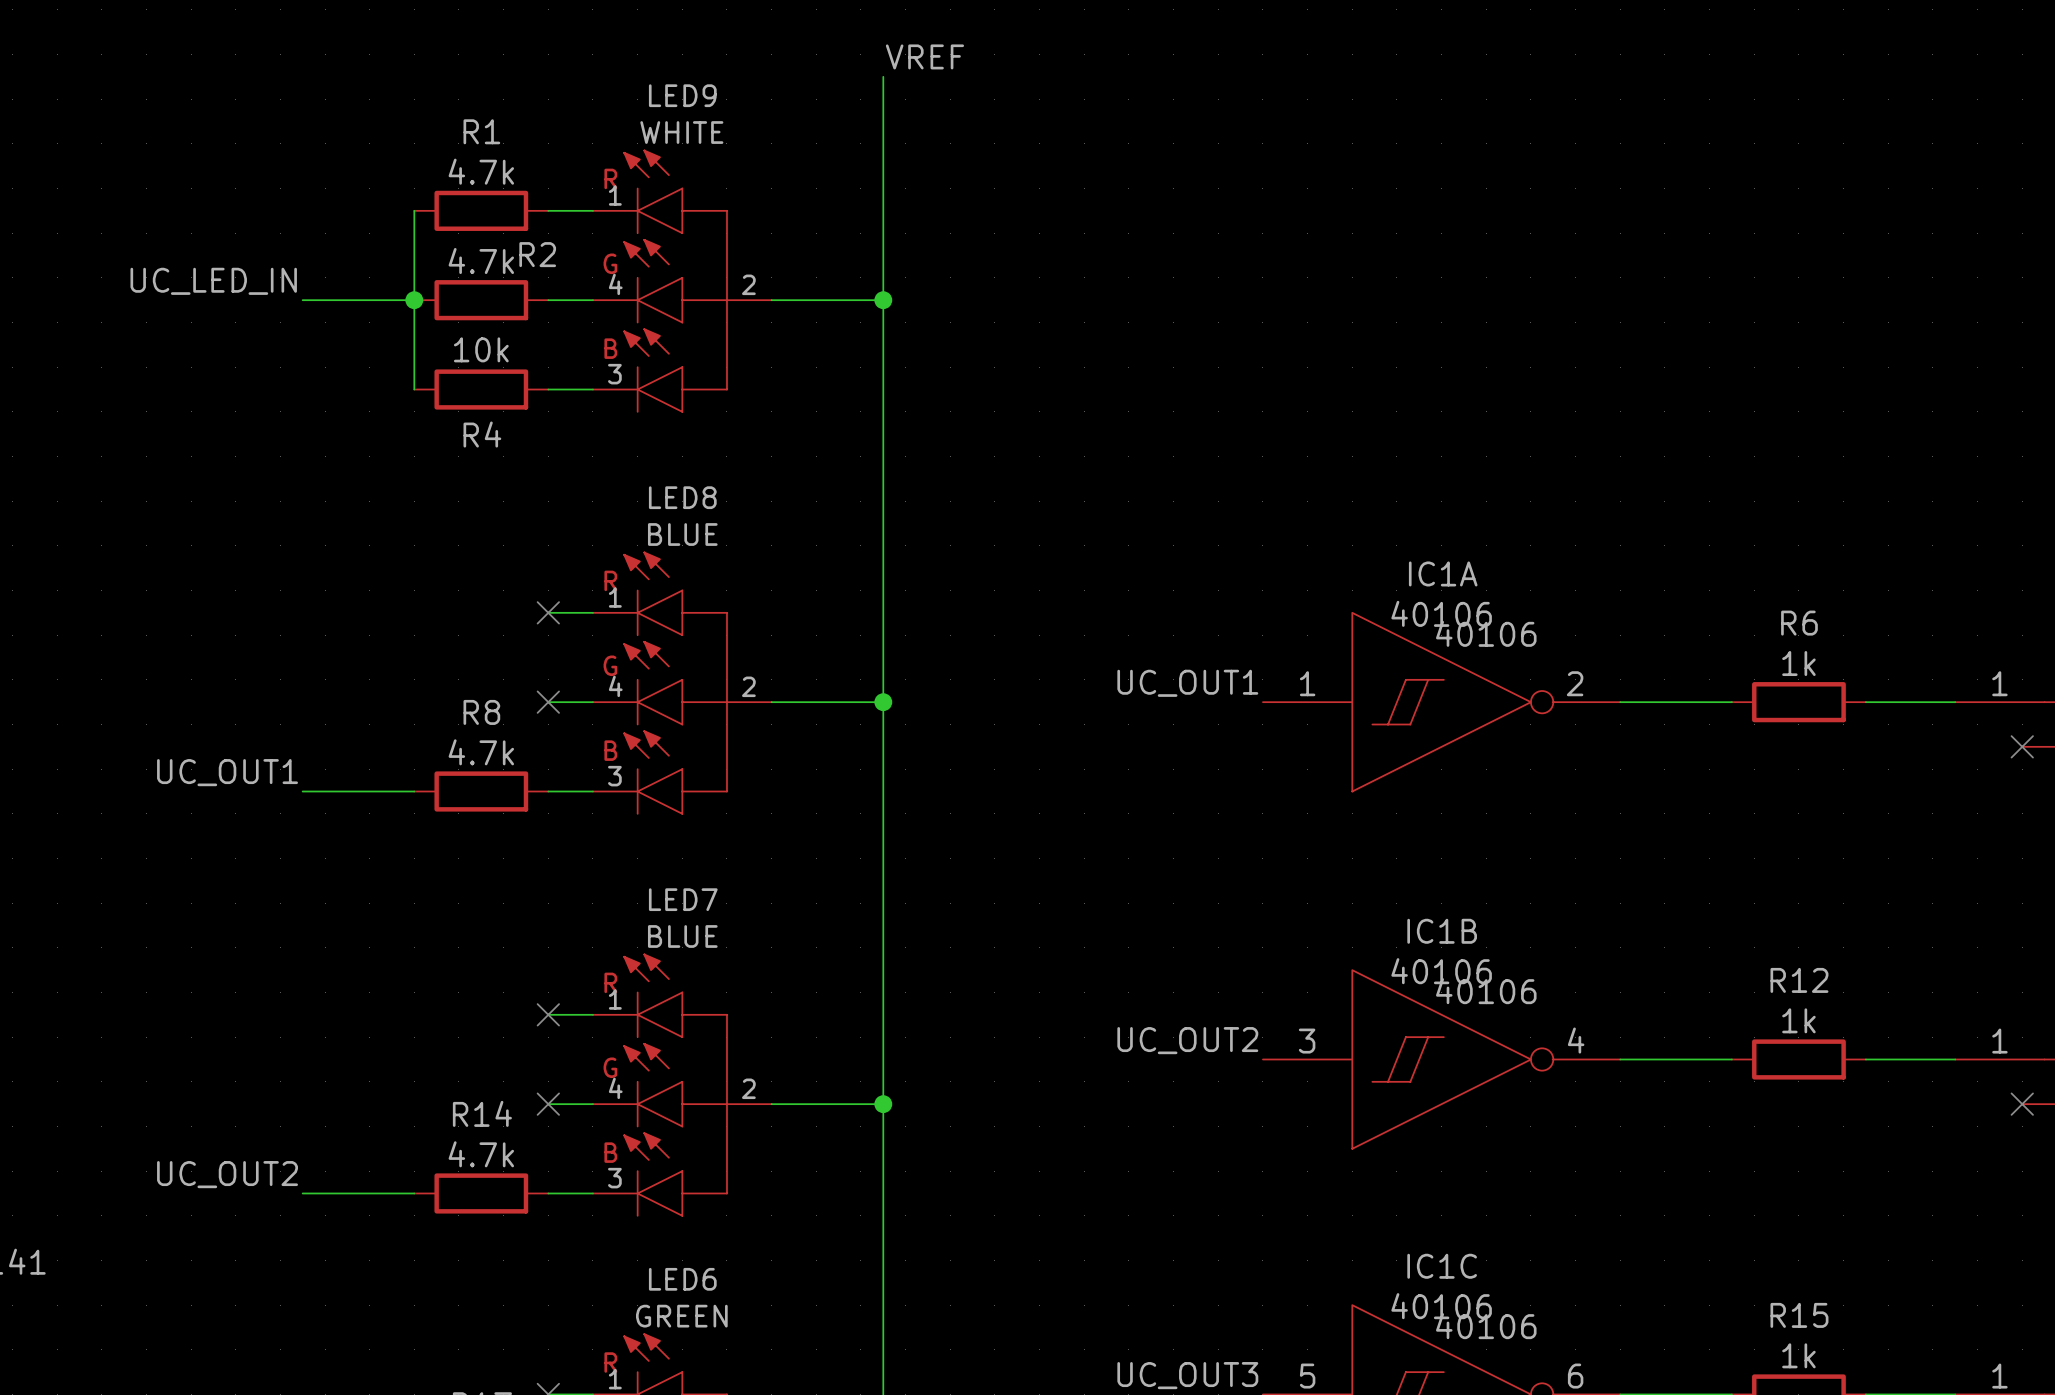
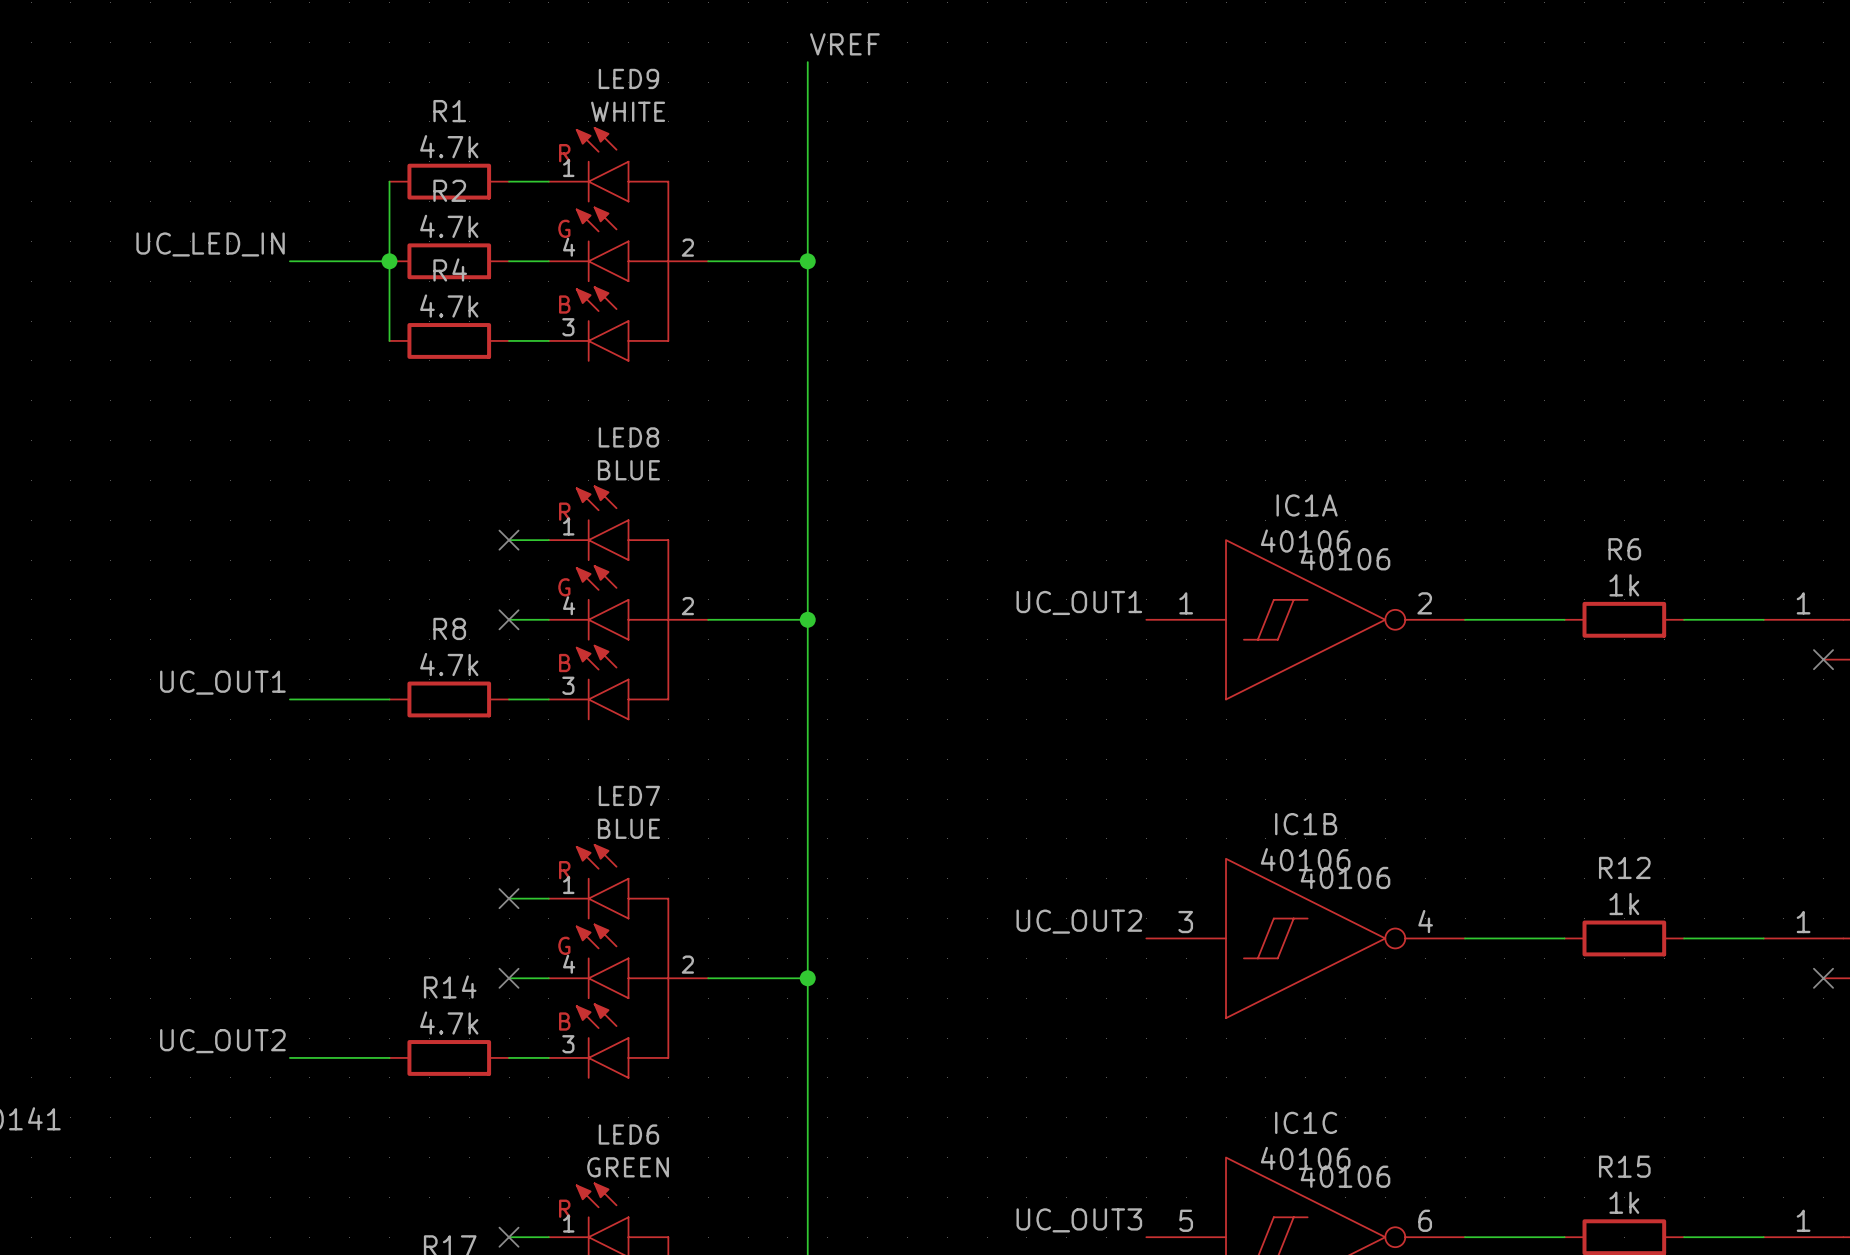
R2 name position: R2 (537, 254) -> R2 (449, 190)
R4 text: 10k (481, 349) -> 4.7k (449, 306)
R4 name position: R4 (482, 434) -> R4 (450, 269)

